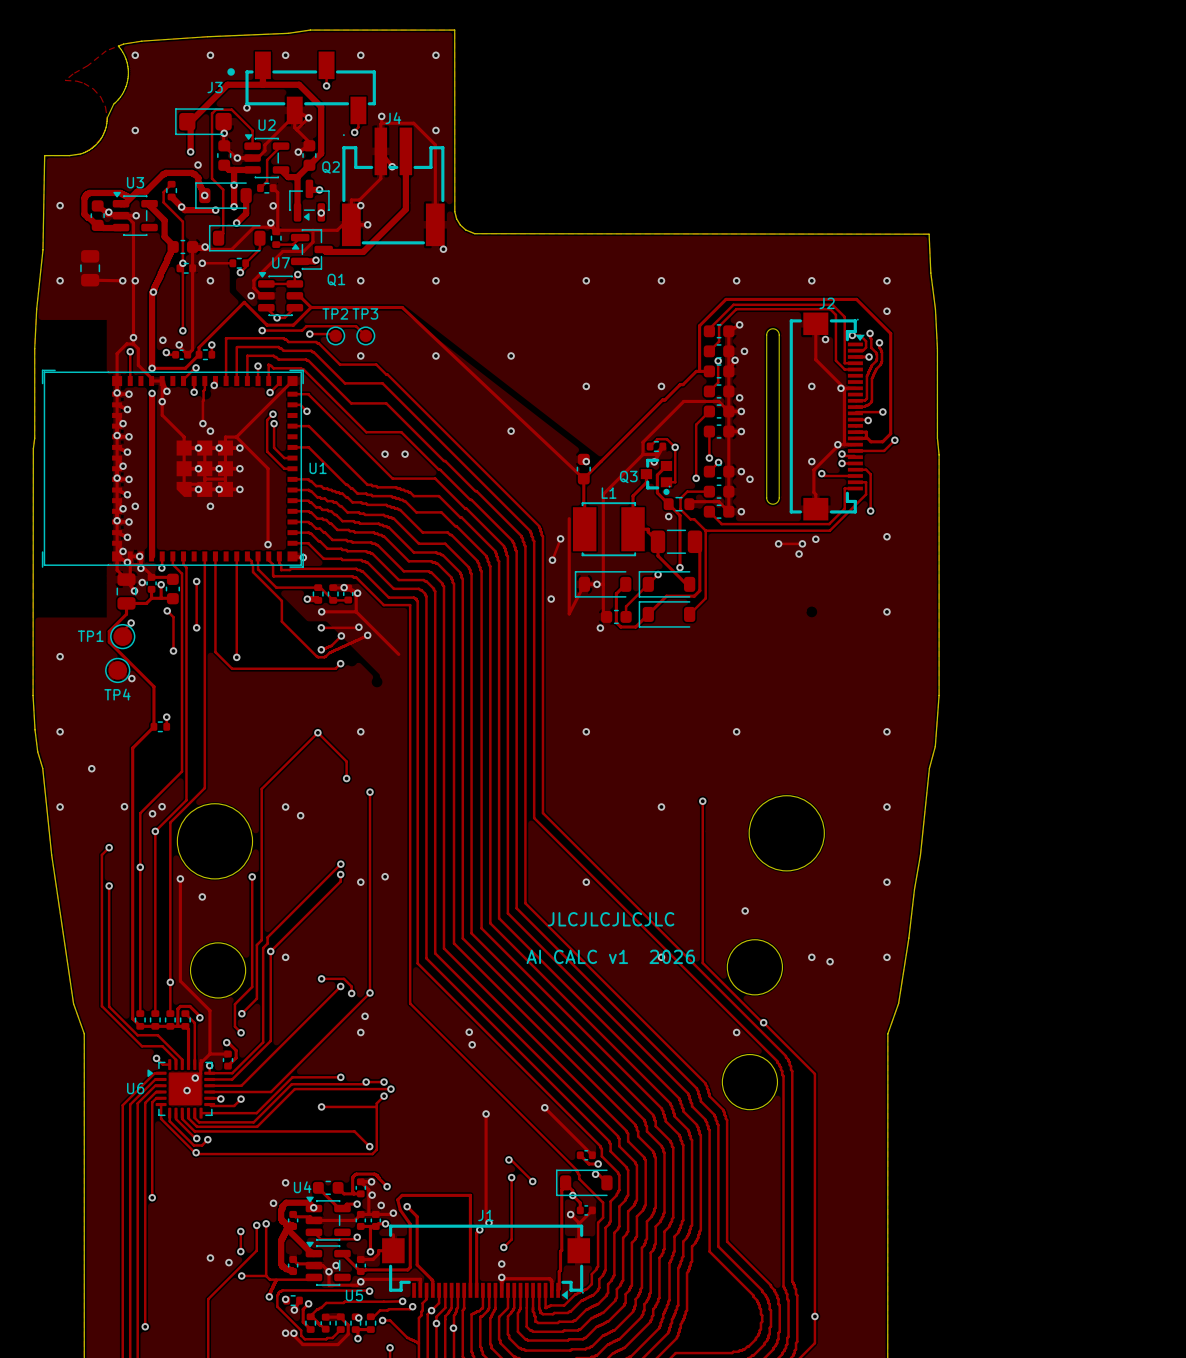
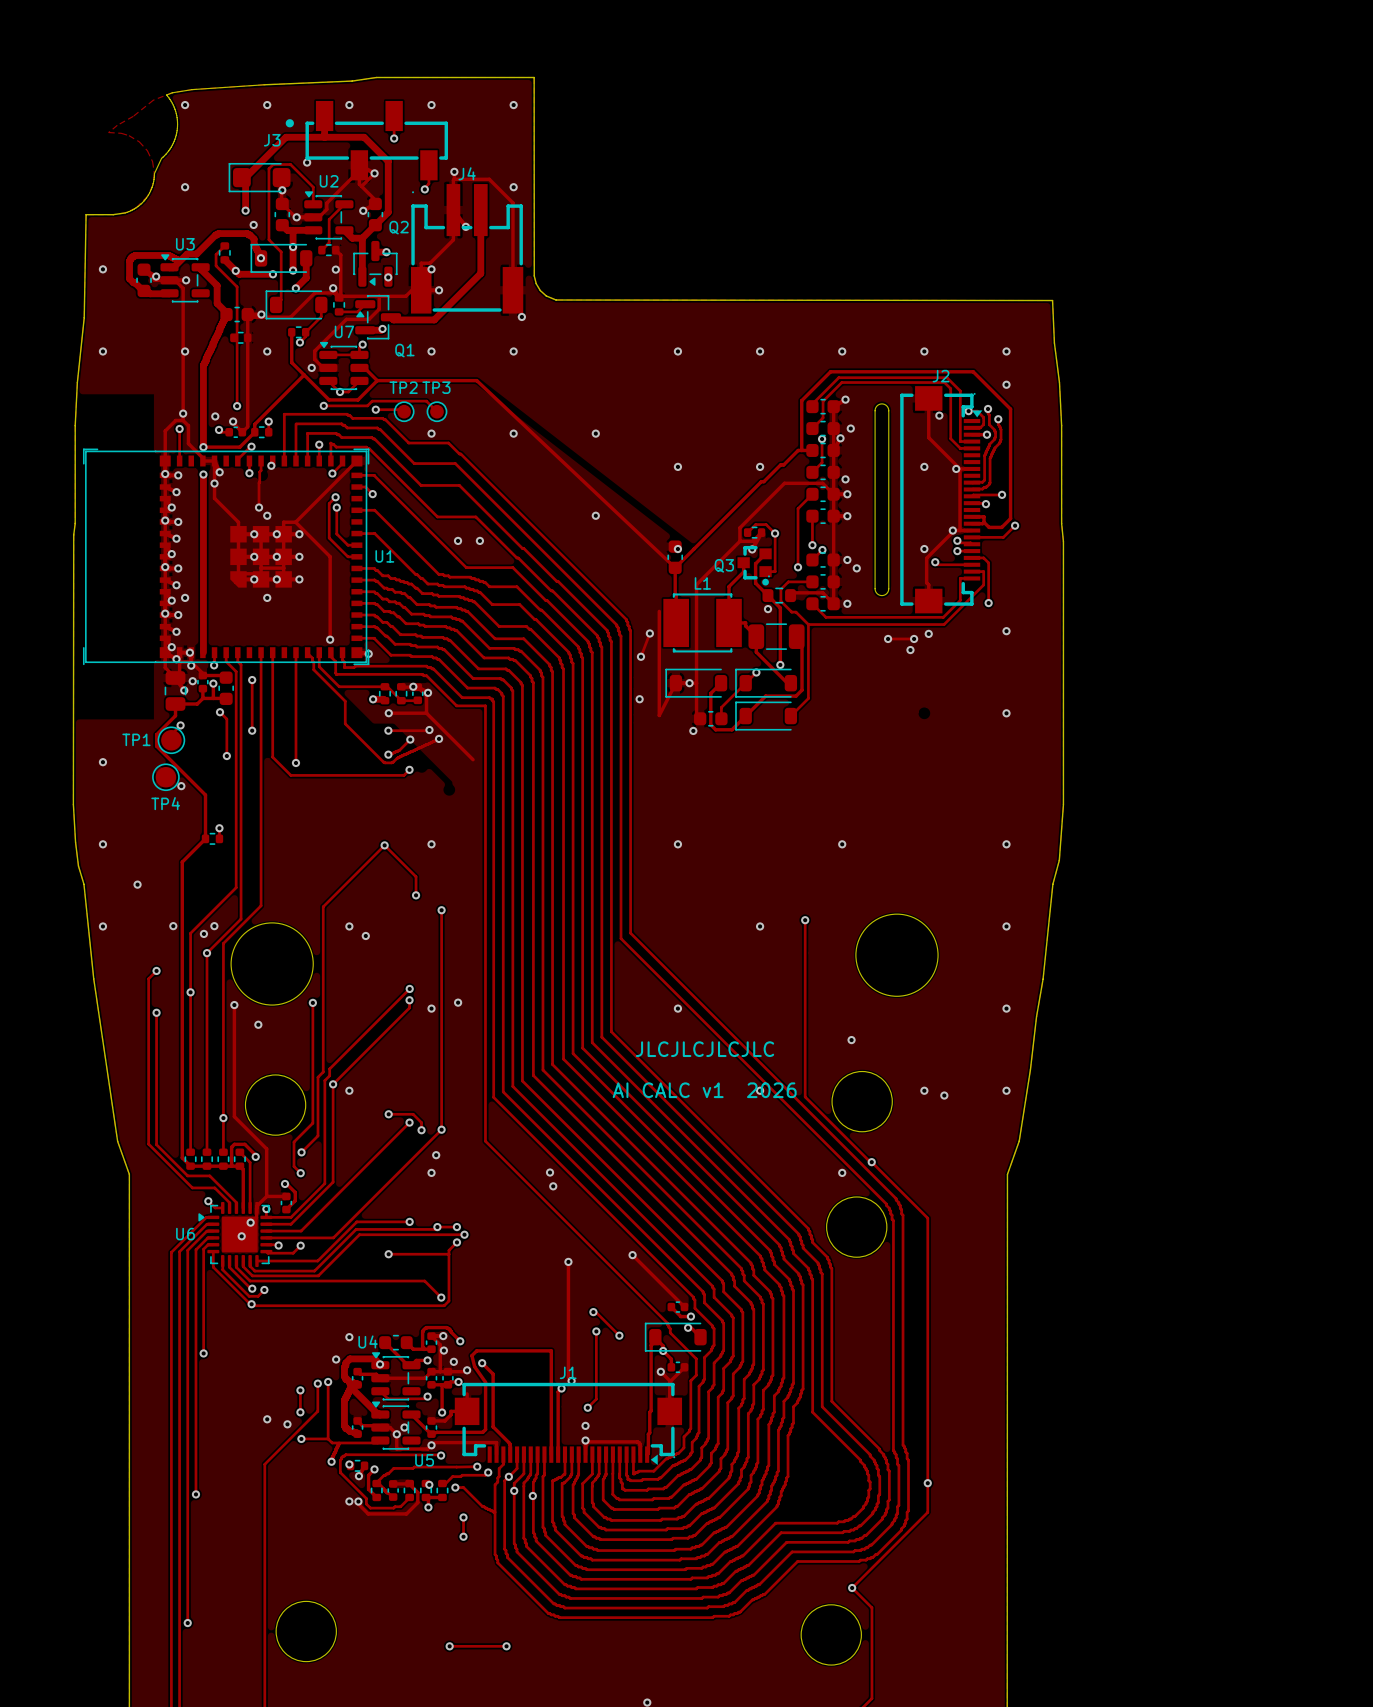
via: (182, 263) -> none
track: (202, 263) (232, 263) -> (304, 374) (291, 362) (291, 332)
via: (202, 263) -> none
part: (90, 268) -> none
track: (90, 280) (122, 280) -> none
via: (122, 280) -> none
via: (153, 292) -> none

